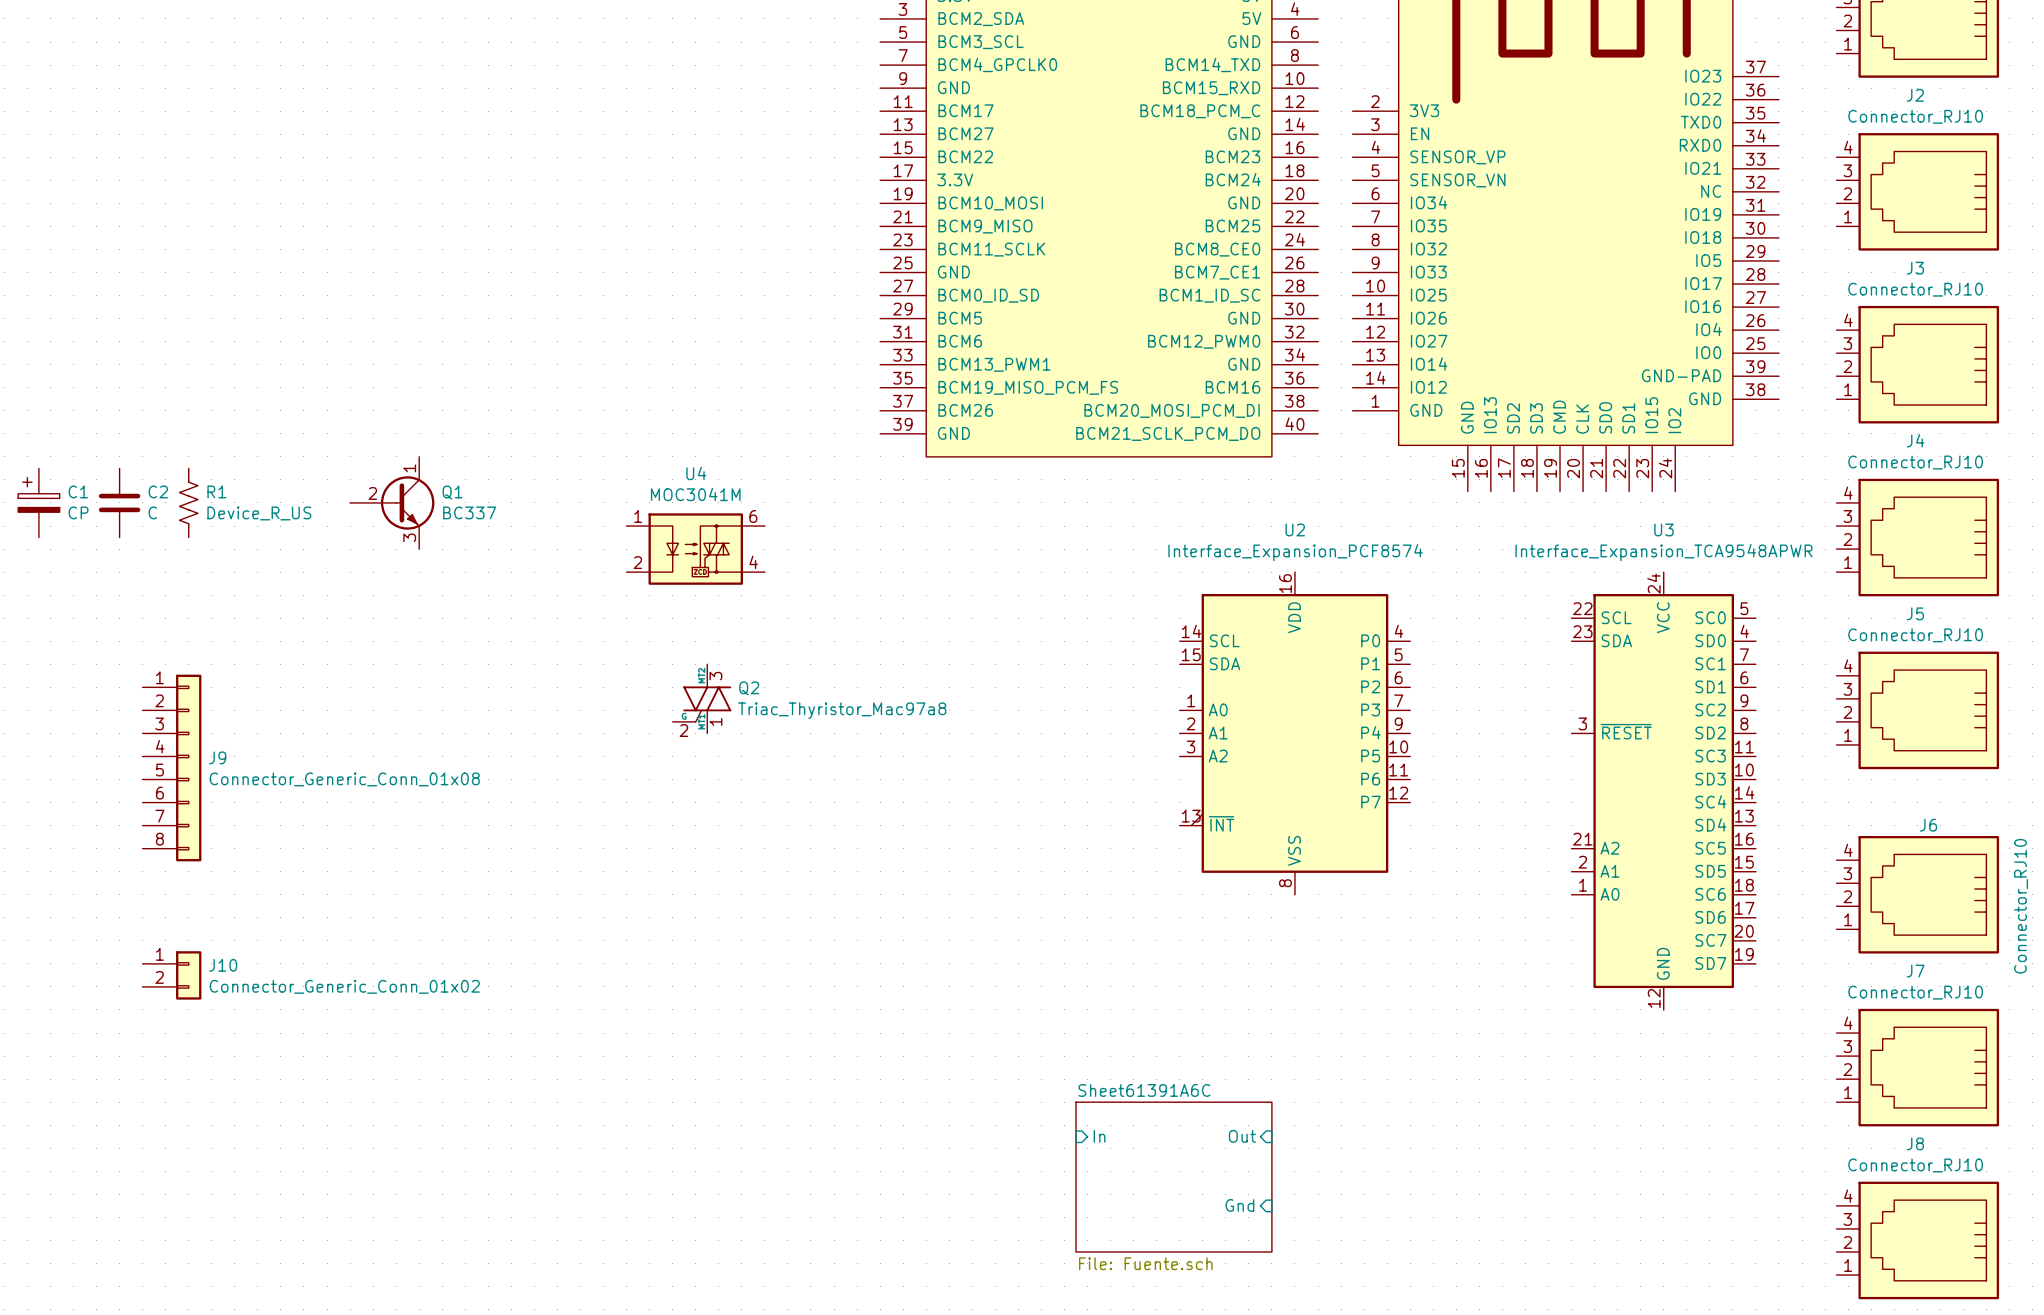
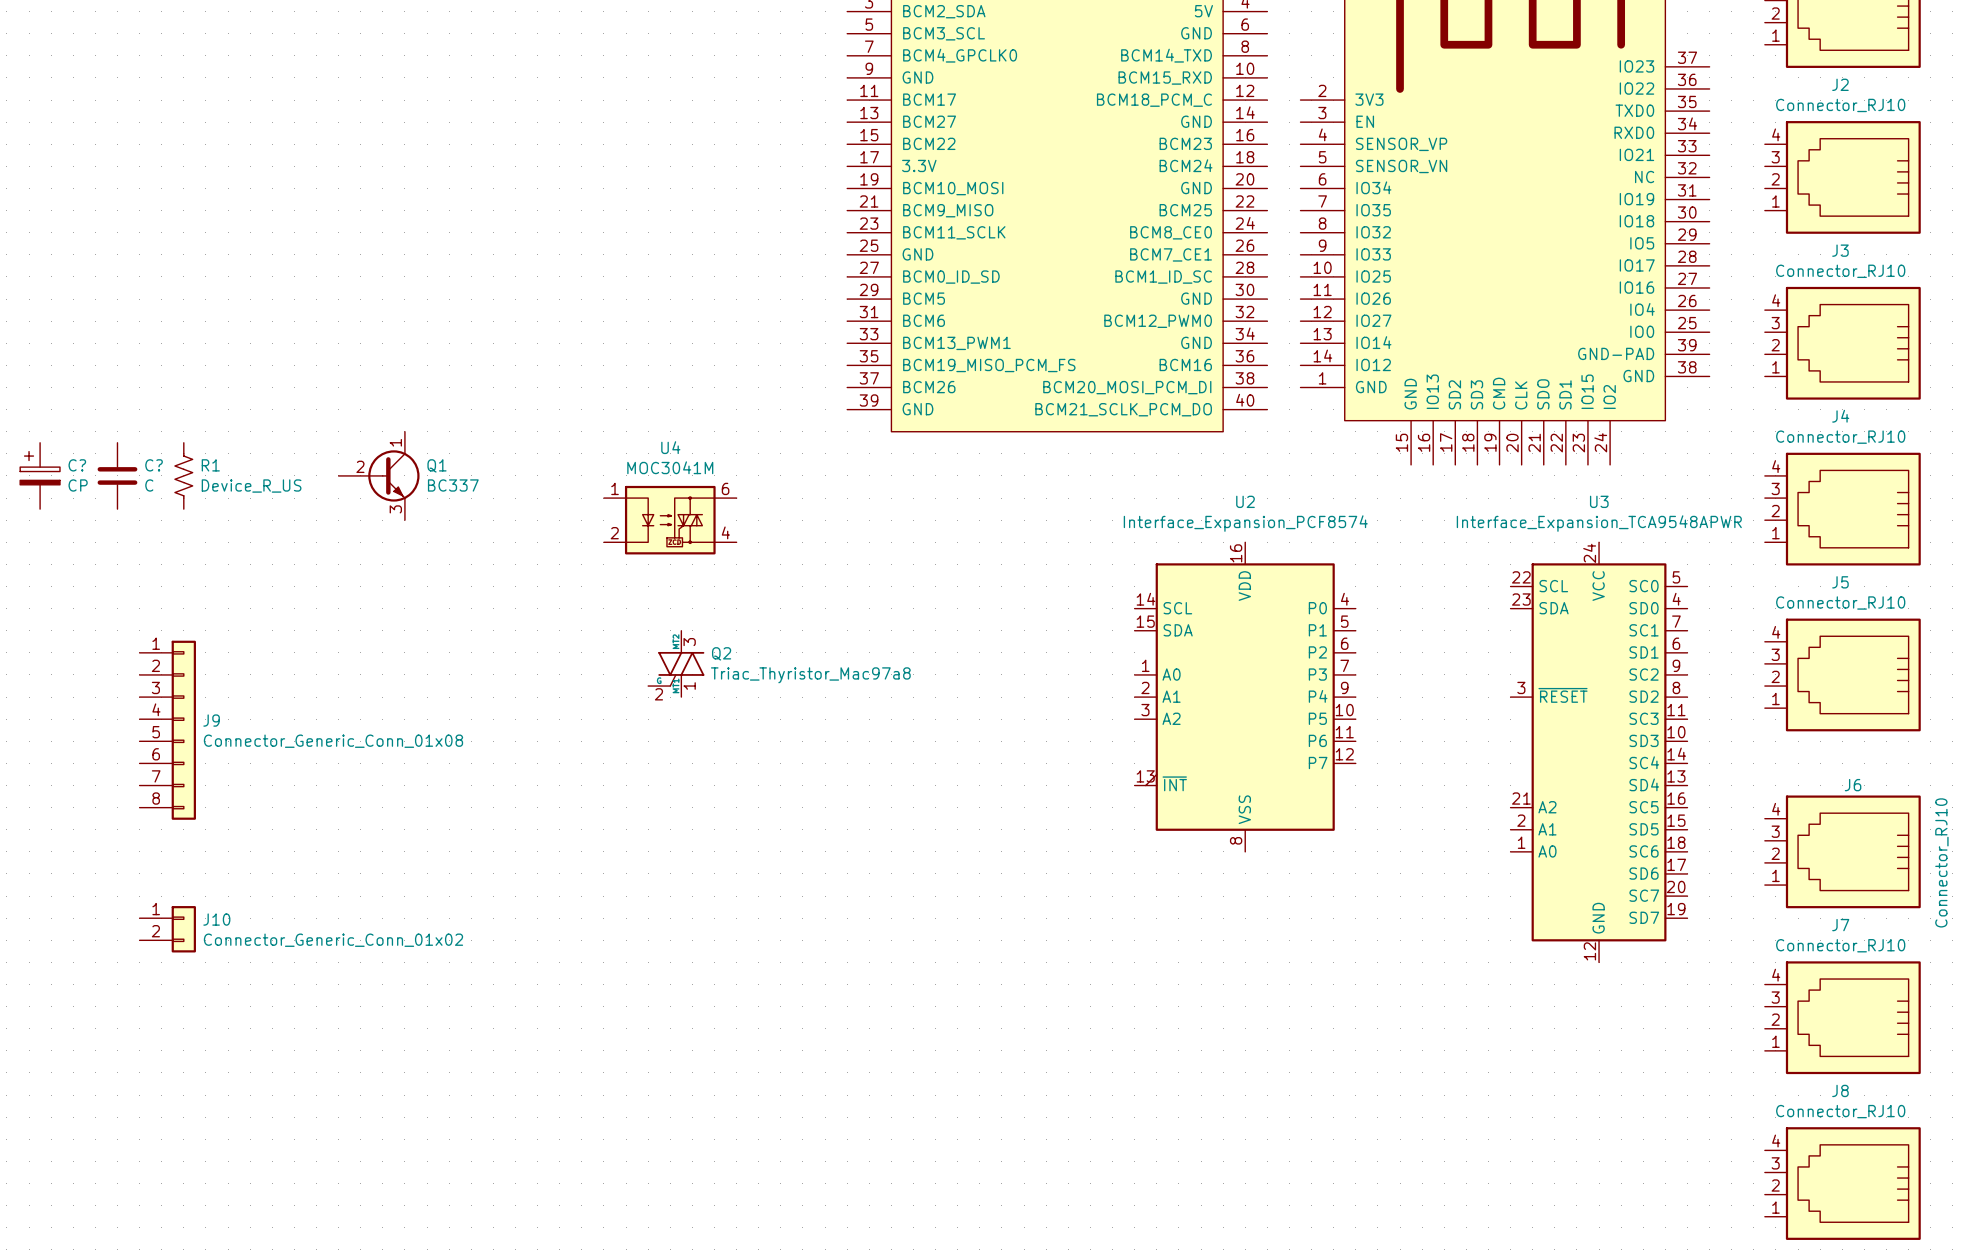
C1 name: C1 (78, 491) -> C? (77, 465)
C2 name: C2 (158, 491) -> C? (154, 465)
sheet pin: In (1099, 1136) -> none
sheet pin: Out (1242, 1136) -> none
sheet Sheet61391A6C: File: Fuente.sch (1173, 1177) -> none
sheet pin: Gnd (1239, 1205) -> none

